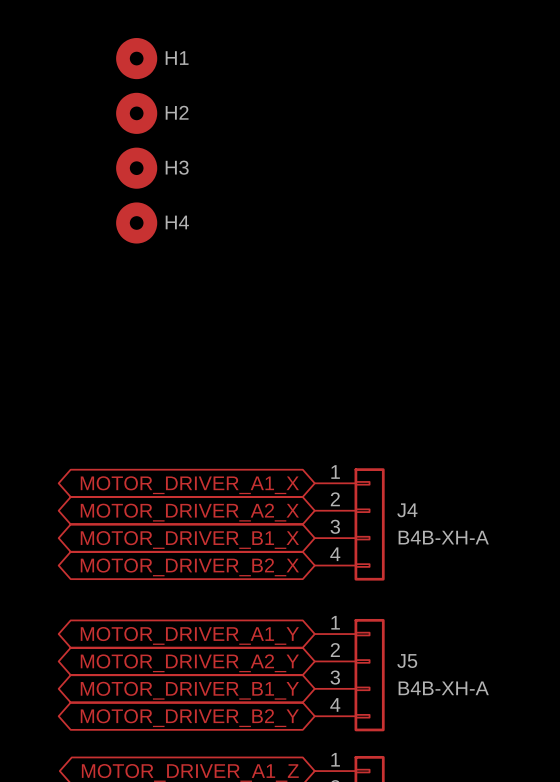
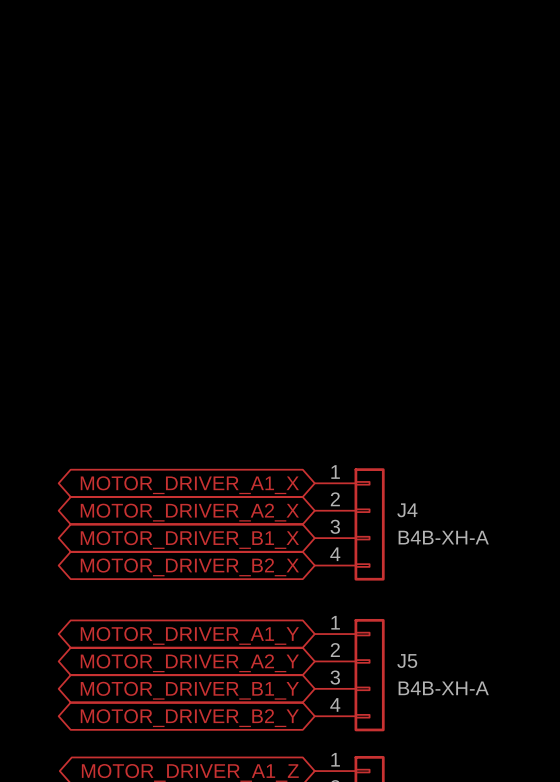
H1: (136, 58) -> none
H2: (136, 113) -> none
H3: (136, 168) -> none
H4: (136, 222) -> none

